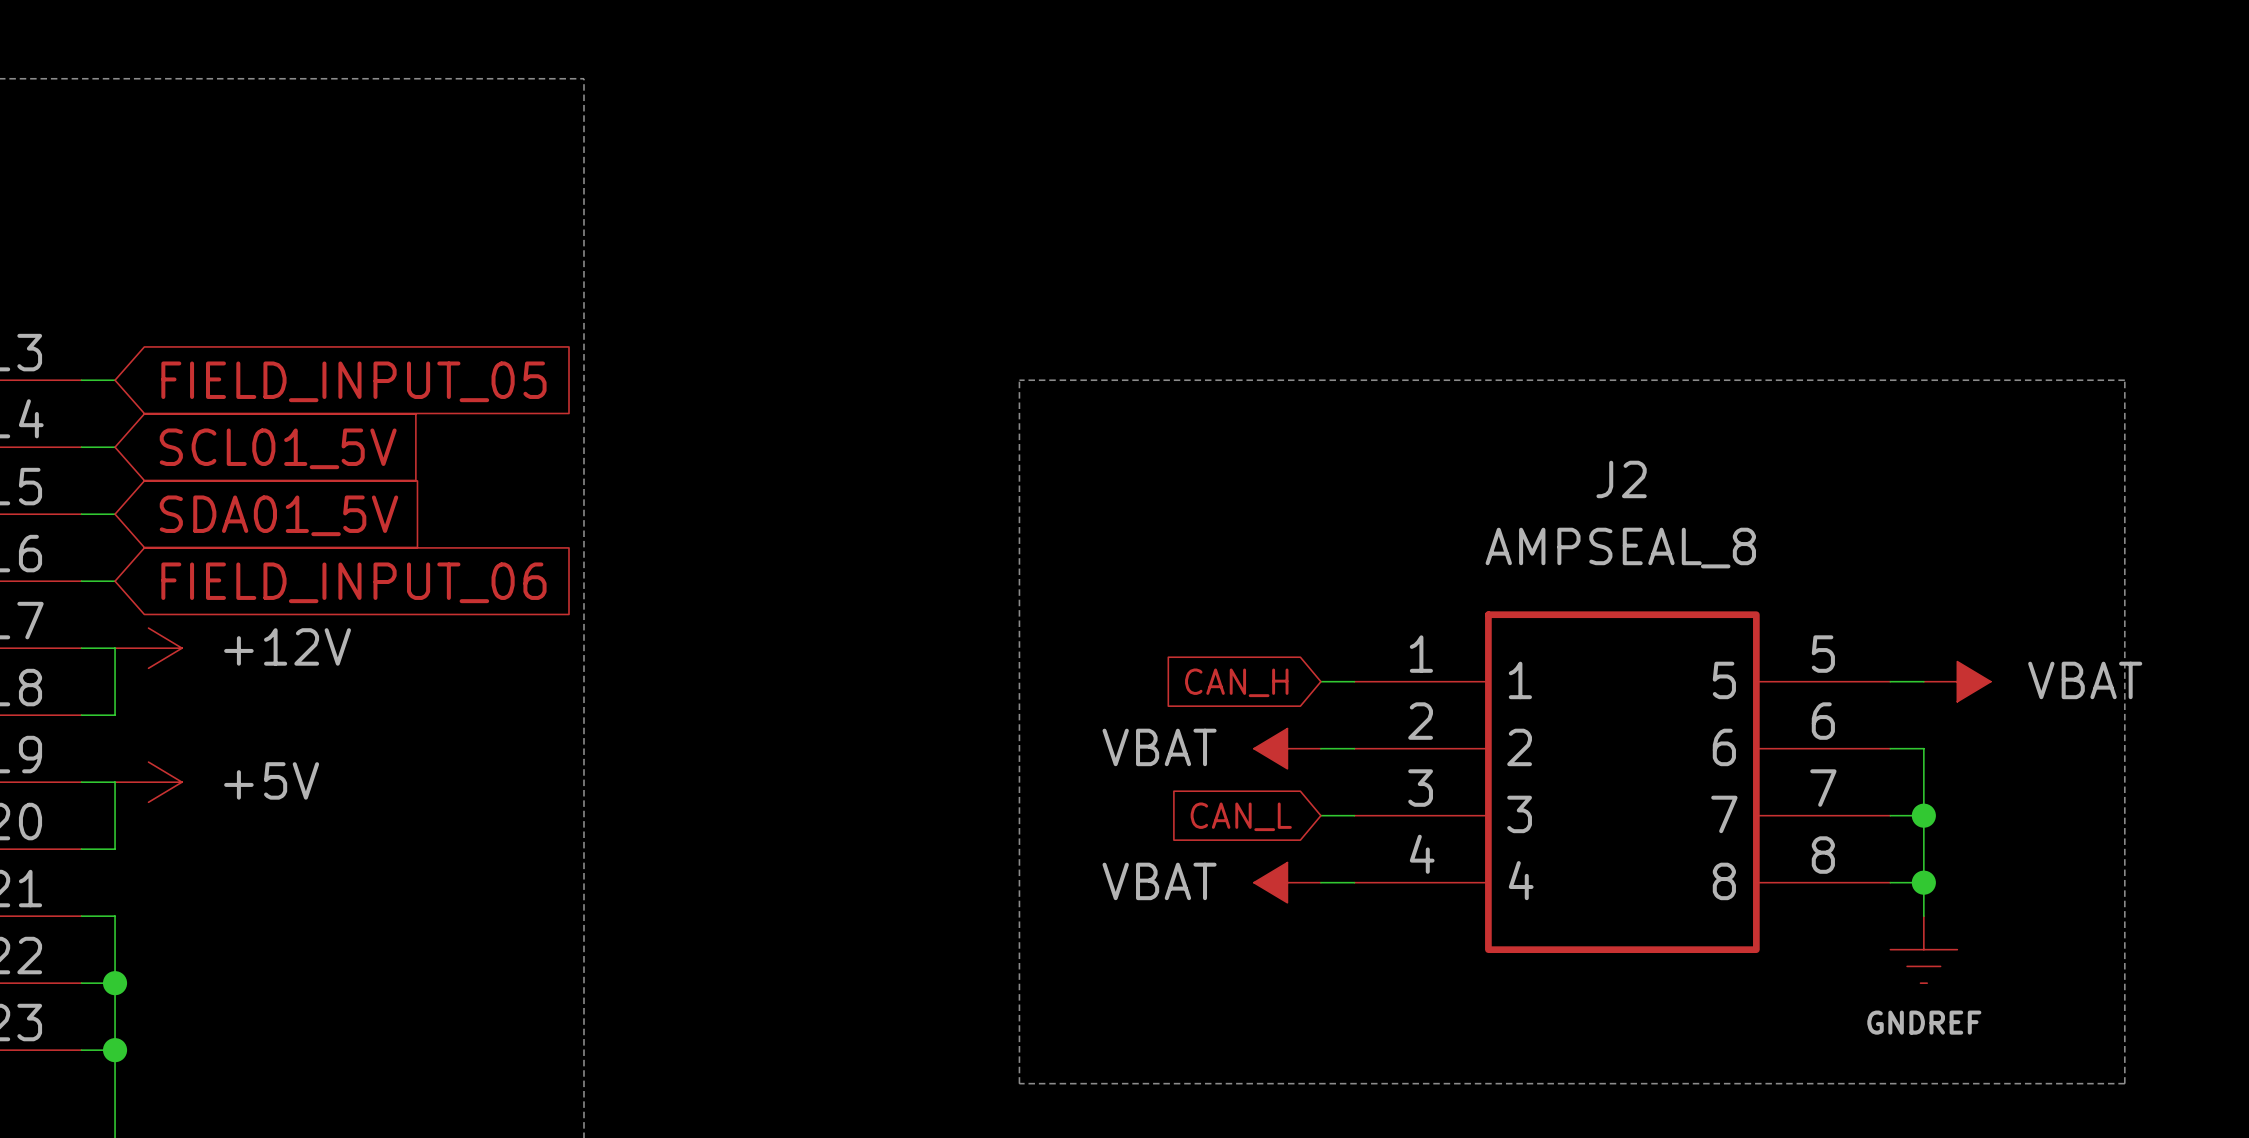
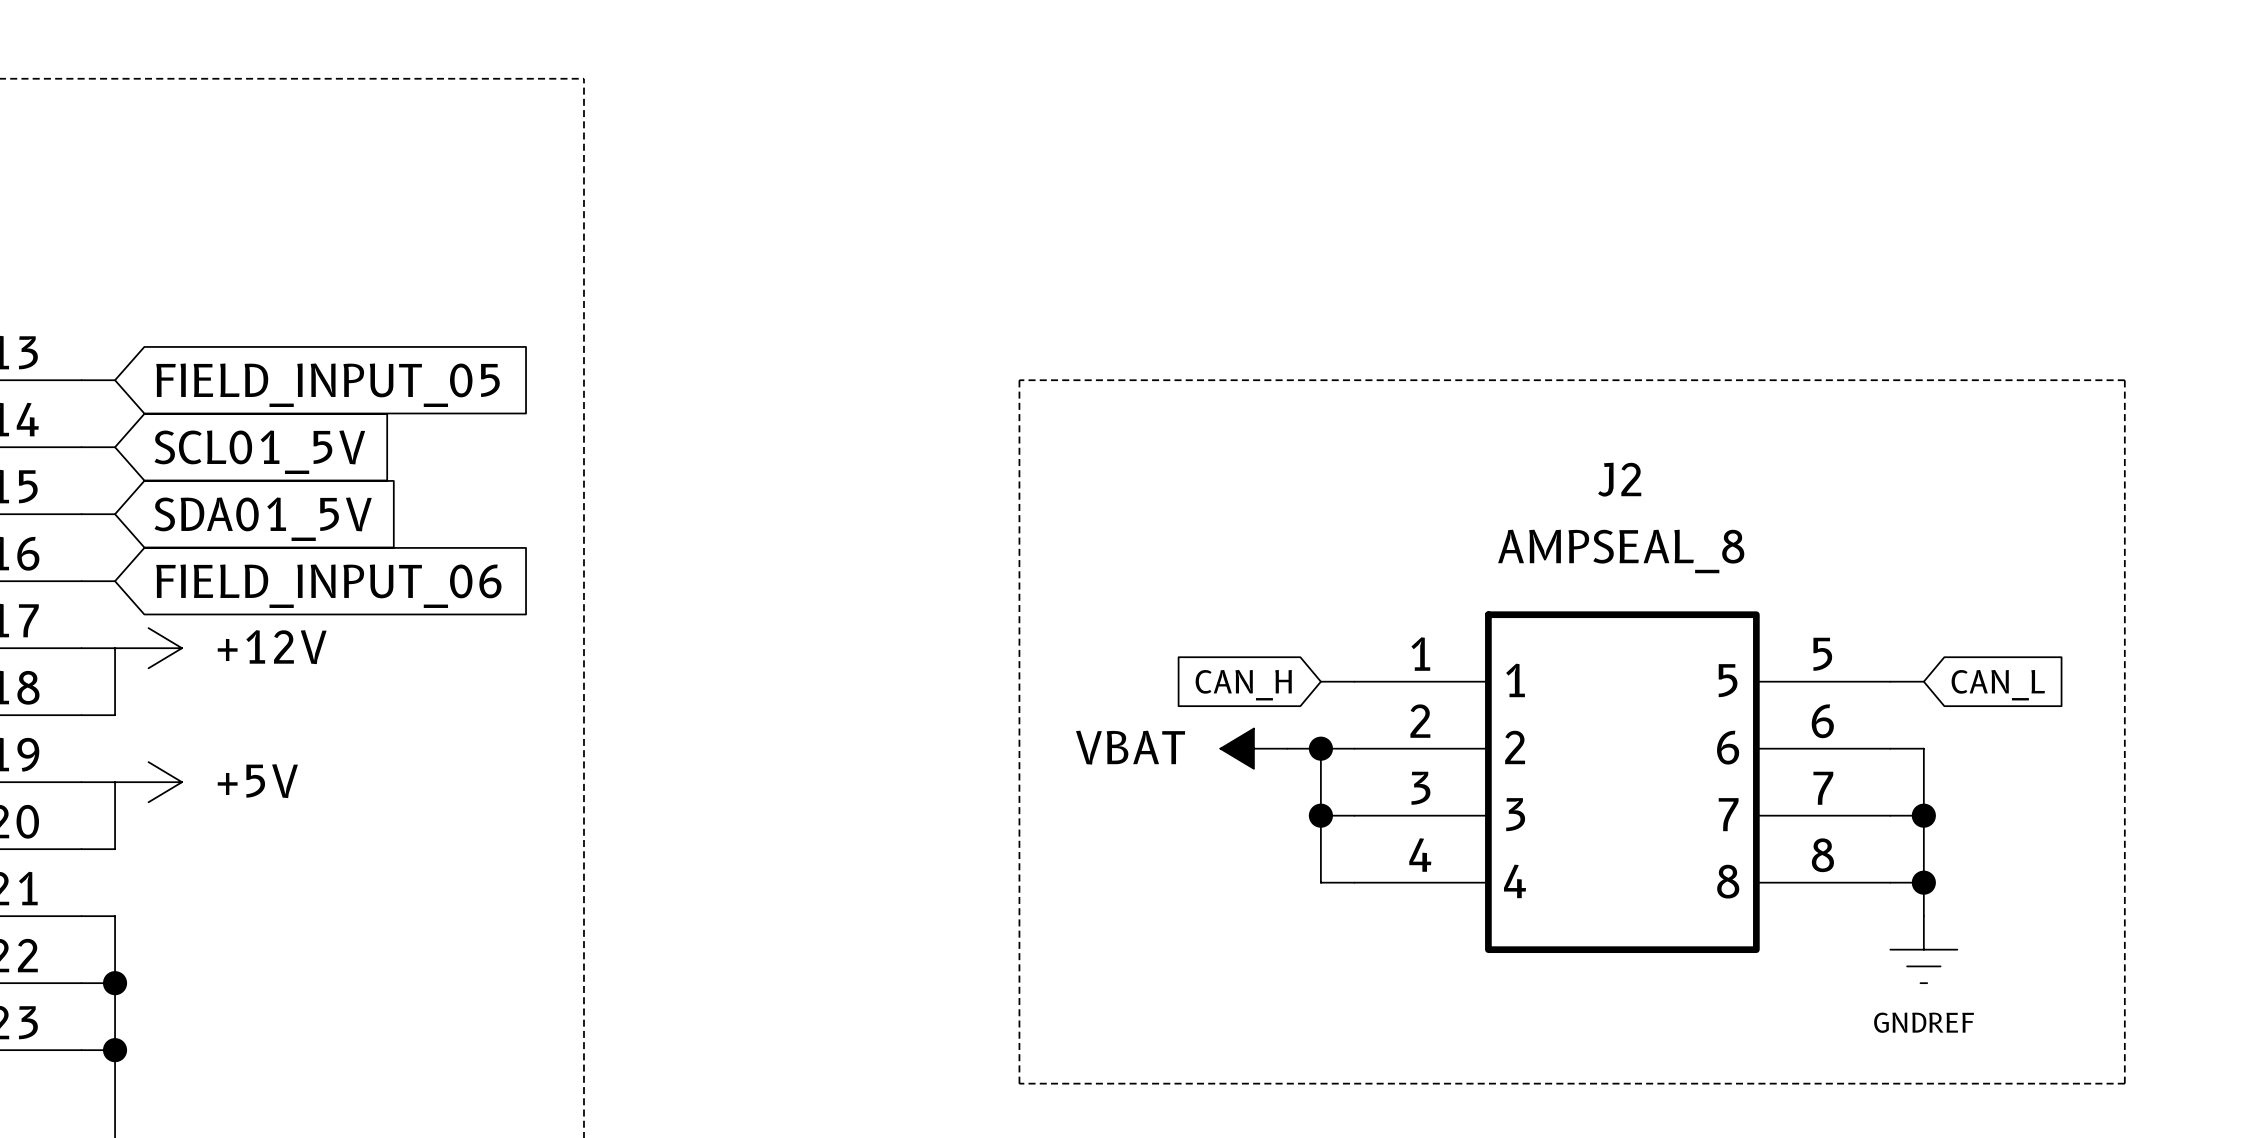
power symbol: VBAT (1957, 681) -> none
wire: none -> (1287, 748) (1320, 748) (1320, 882)
power symbol position: VBAT (1287, 748) -> VBAT (1253, 748)
junction: none -> (1320, 748)
junction: none -> (1320, 815)
global label rotation: 0° (1241, 816) -> 180° (1998, 685)
global label position: CAN_L (1241, 816) -> CAN_L (1998, 685)
power symbol: VBAT (1287, 882) -> none

